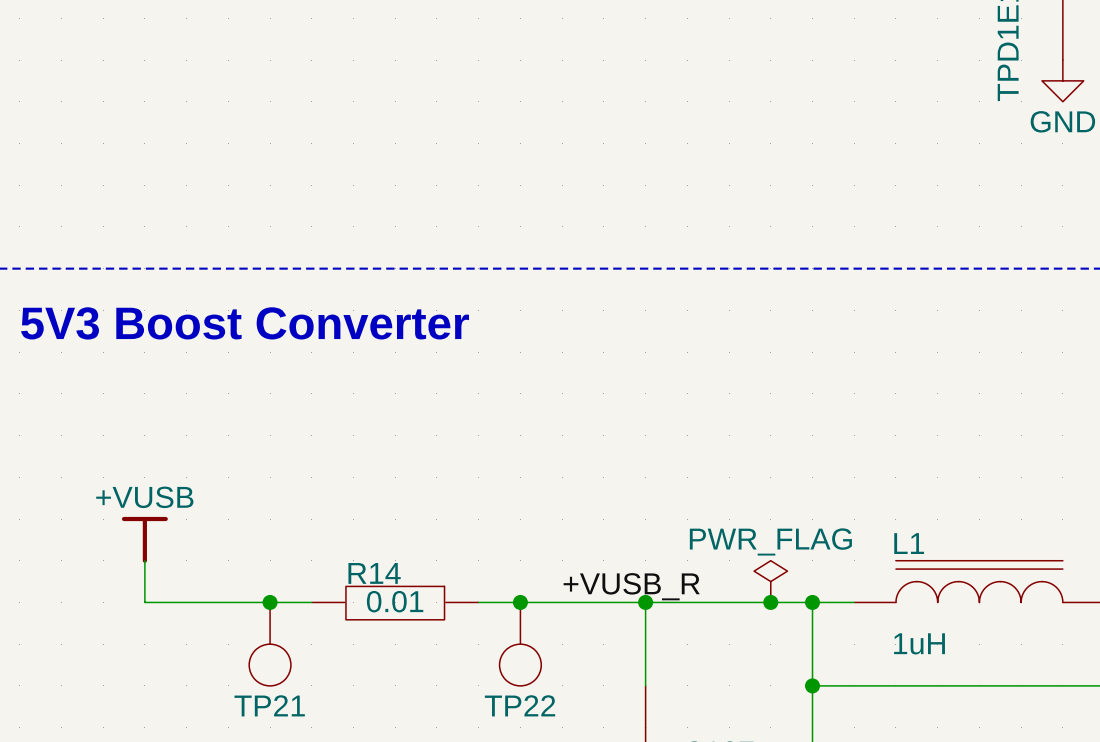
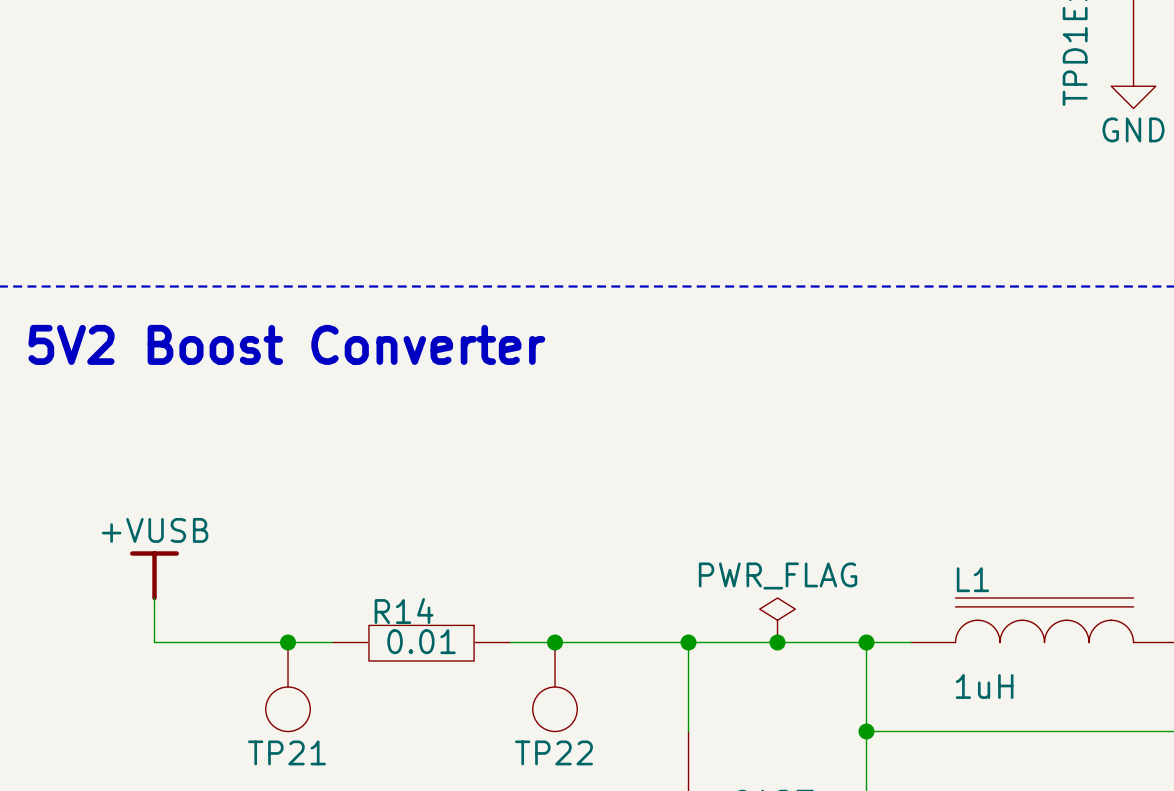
text: 5V3 Boost Converter (245, 323) -> 5V2 Boost Converter (286, 344)
power symbol position: PWR_FLAG (770, 581) -> PWR_FLAG (777, 620)
label: +VUSB_R (631, 586) -> none
junction position: (770, 602) -> (777, 642)

